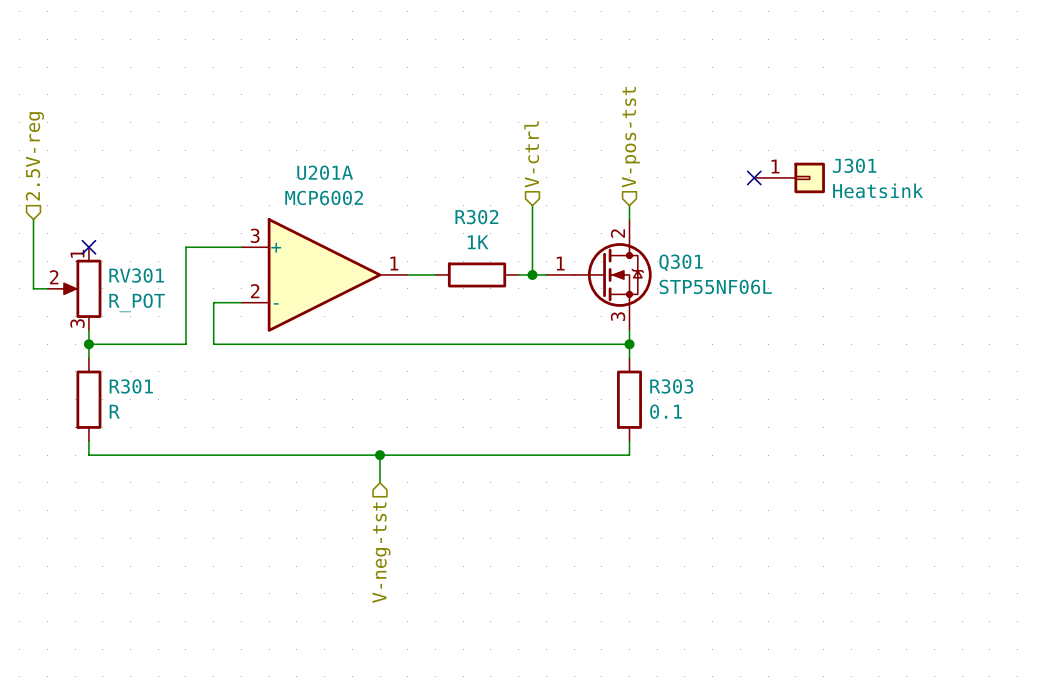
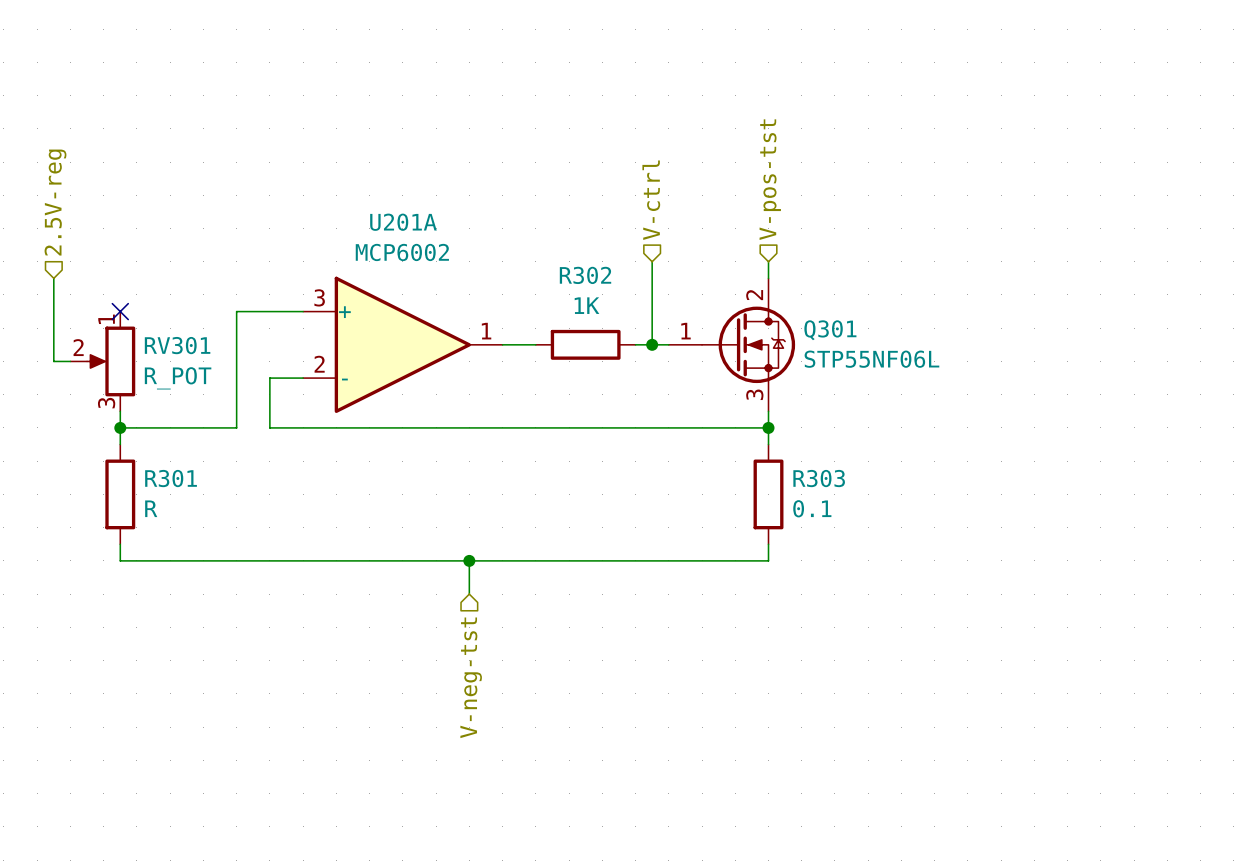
no-connect mark: (754, 177) -> none
J301: Heatsink (789, 177) -> none

